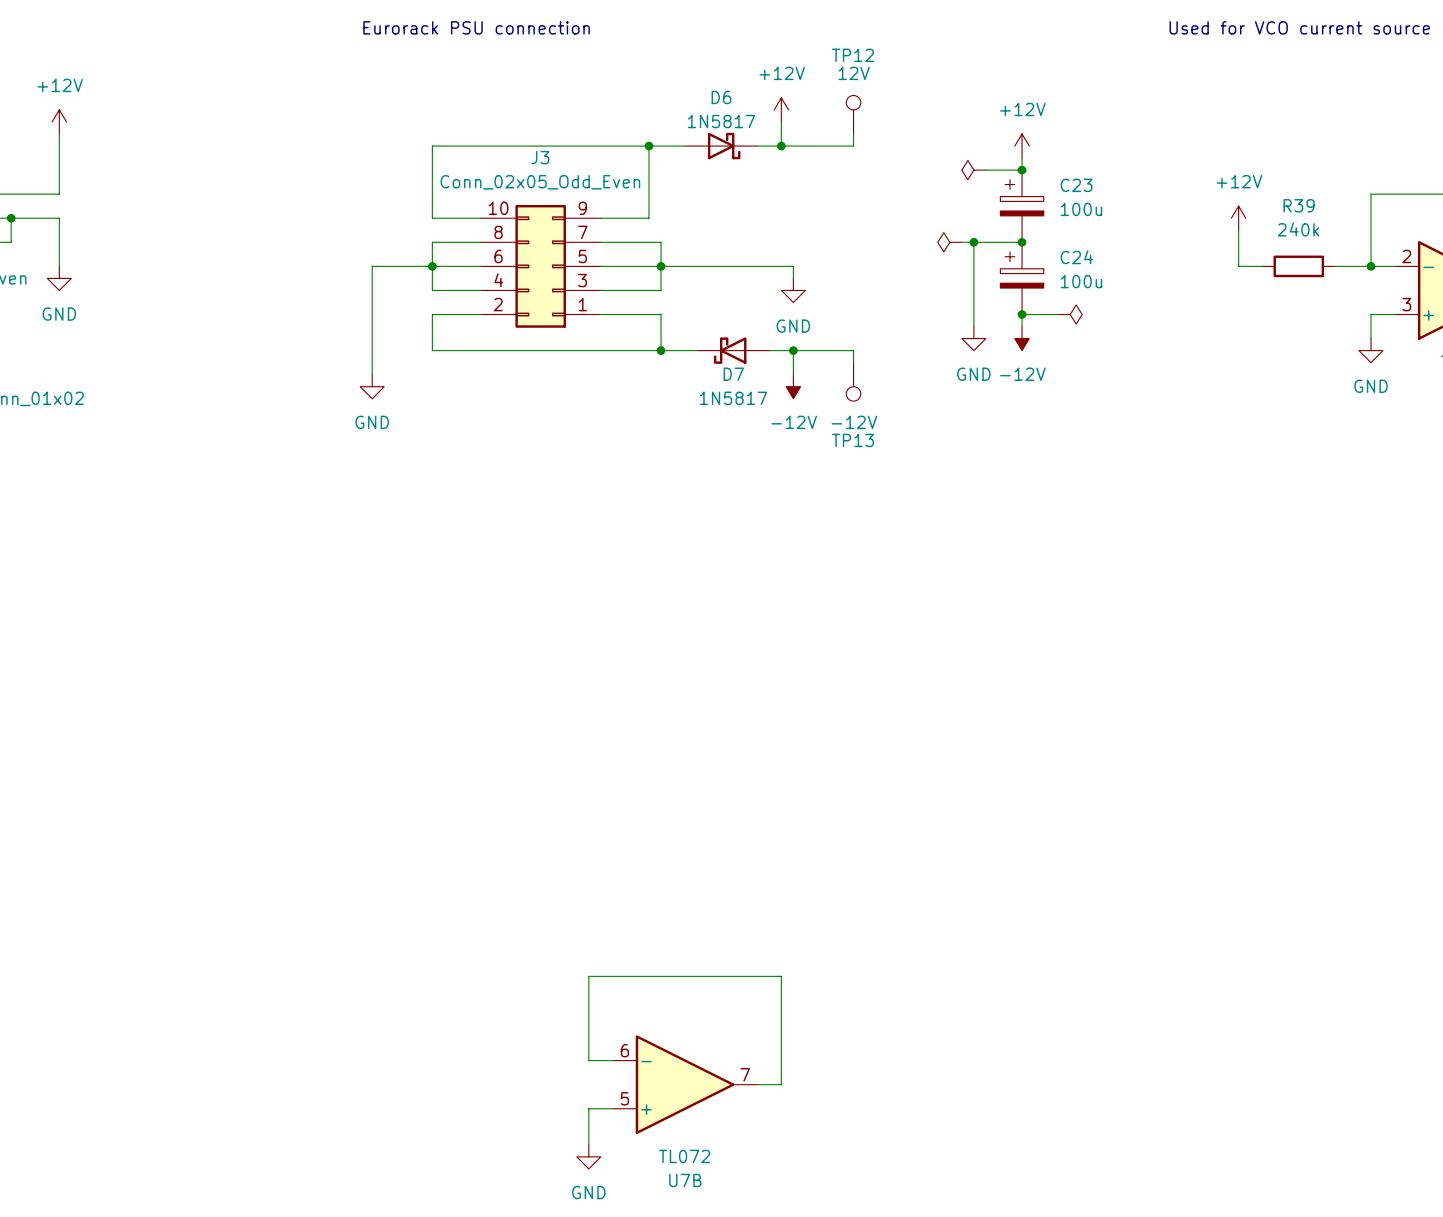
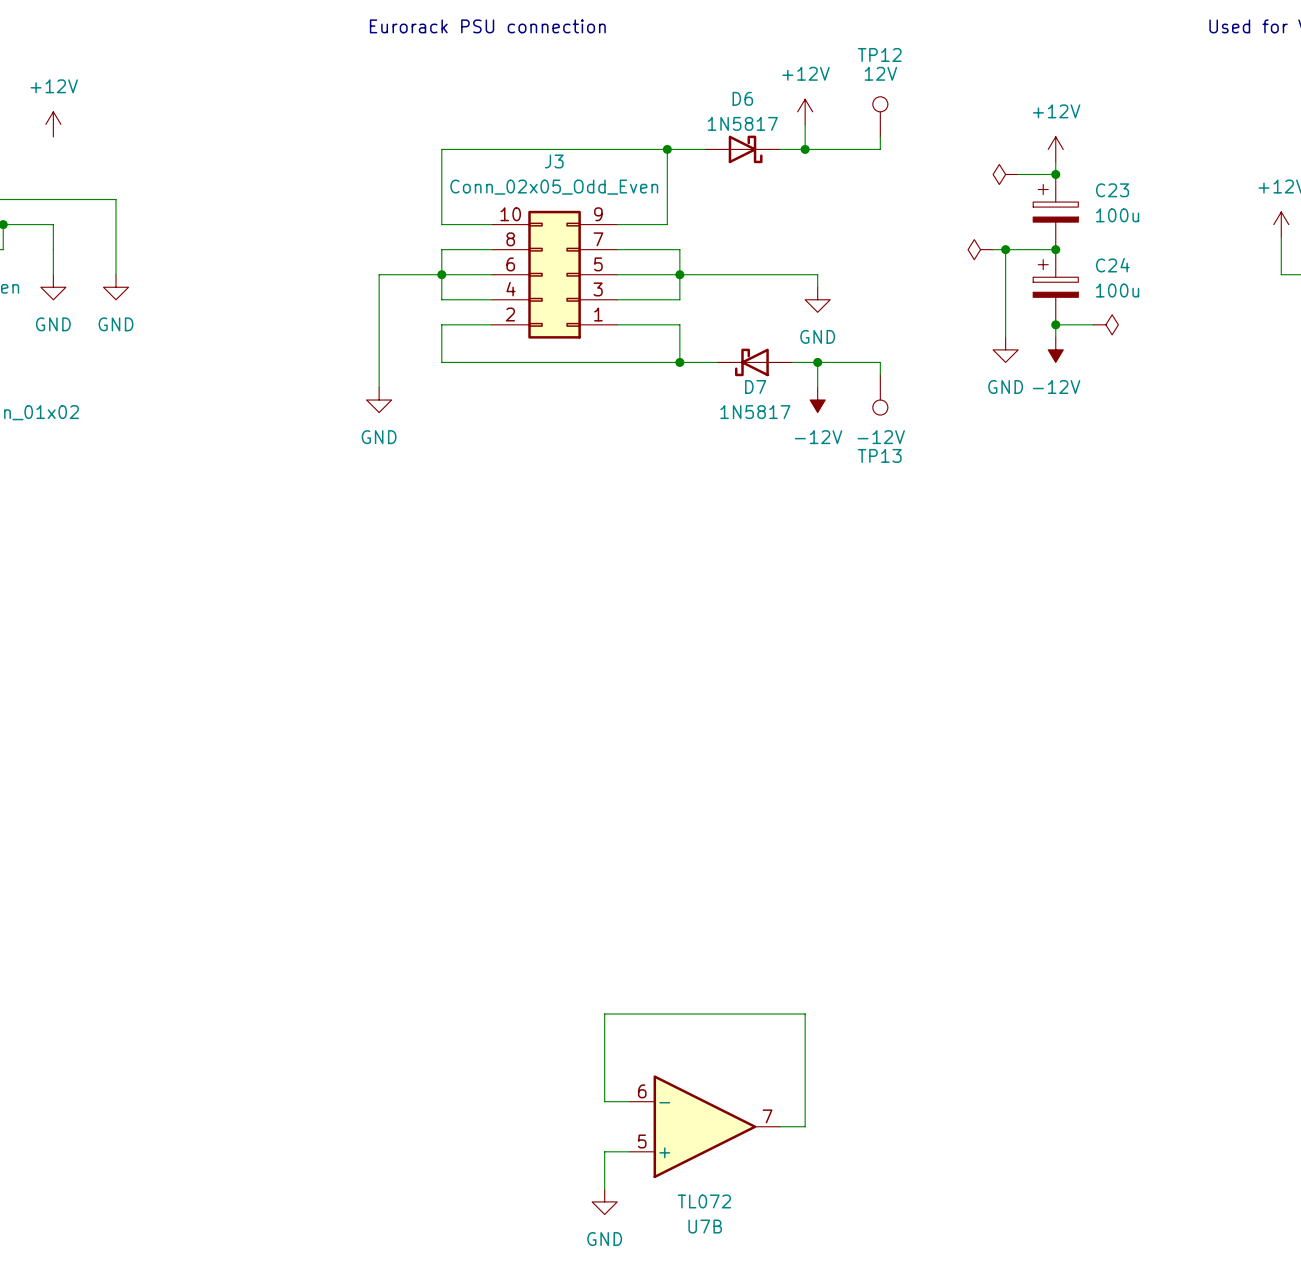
wire: (59, 134) (59, 194) -> (116, 274) (116, 199) (53, 199)
power symbol: none -> GND (116, 287)

